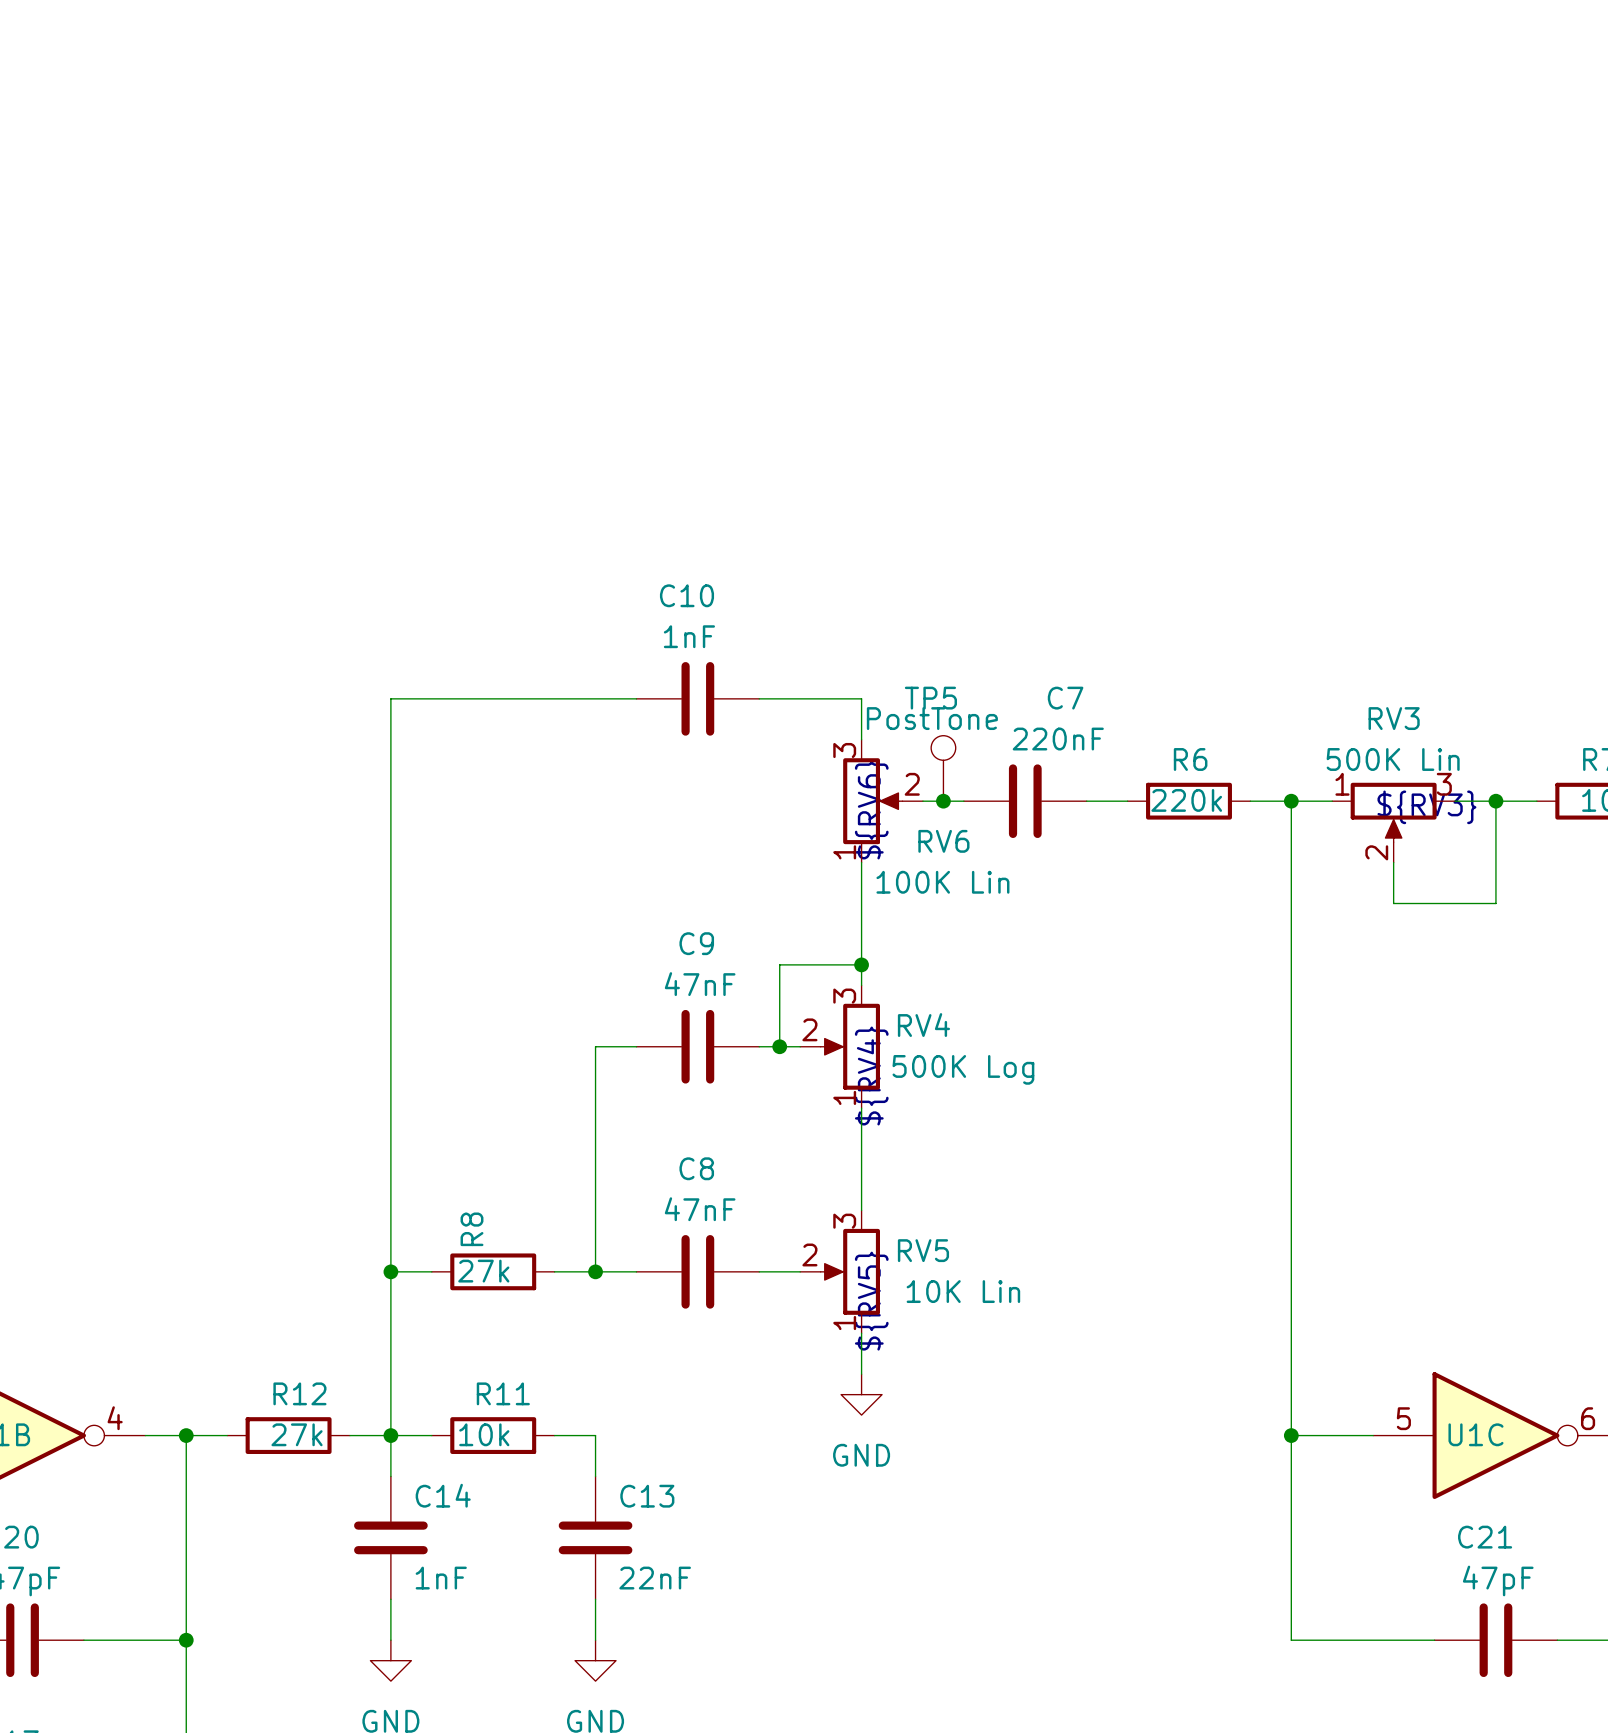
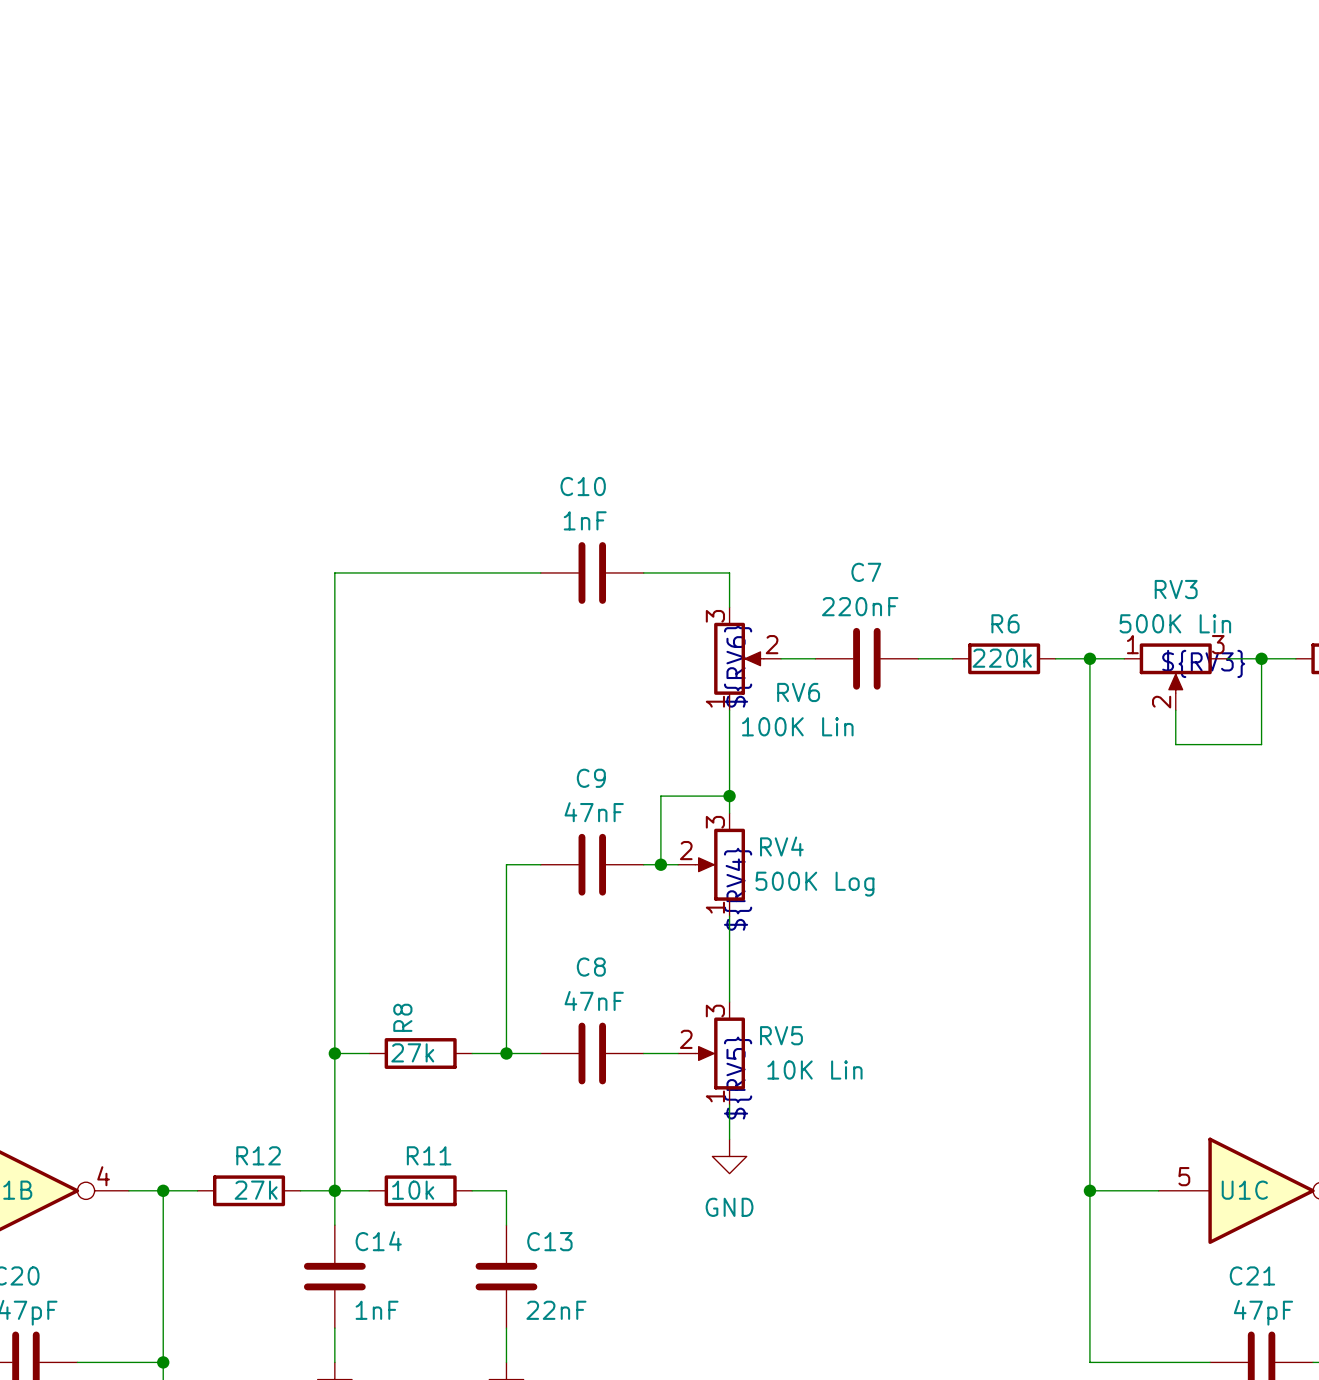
C7 name position: C7 (1065, 698) -> C7 (866, 572)
C7 value position: 220nF (1058, 739) -> 220nF (860, 606)
TP5: PostTone (943, 768) -> none
junction: (943, 801) -> none

